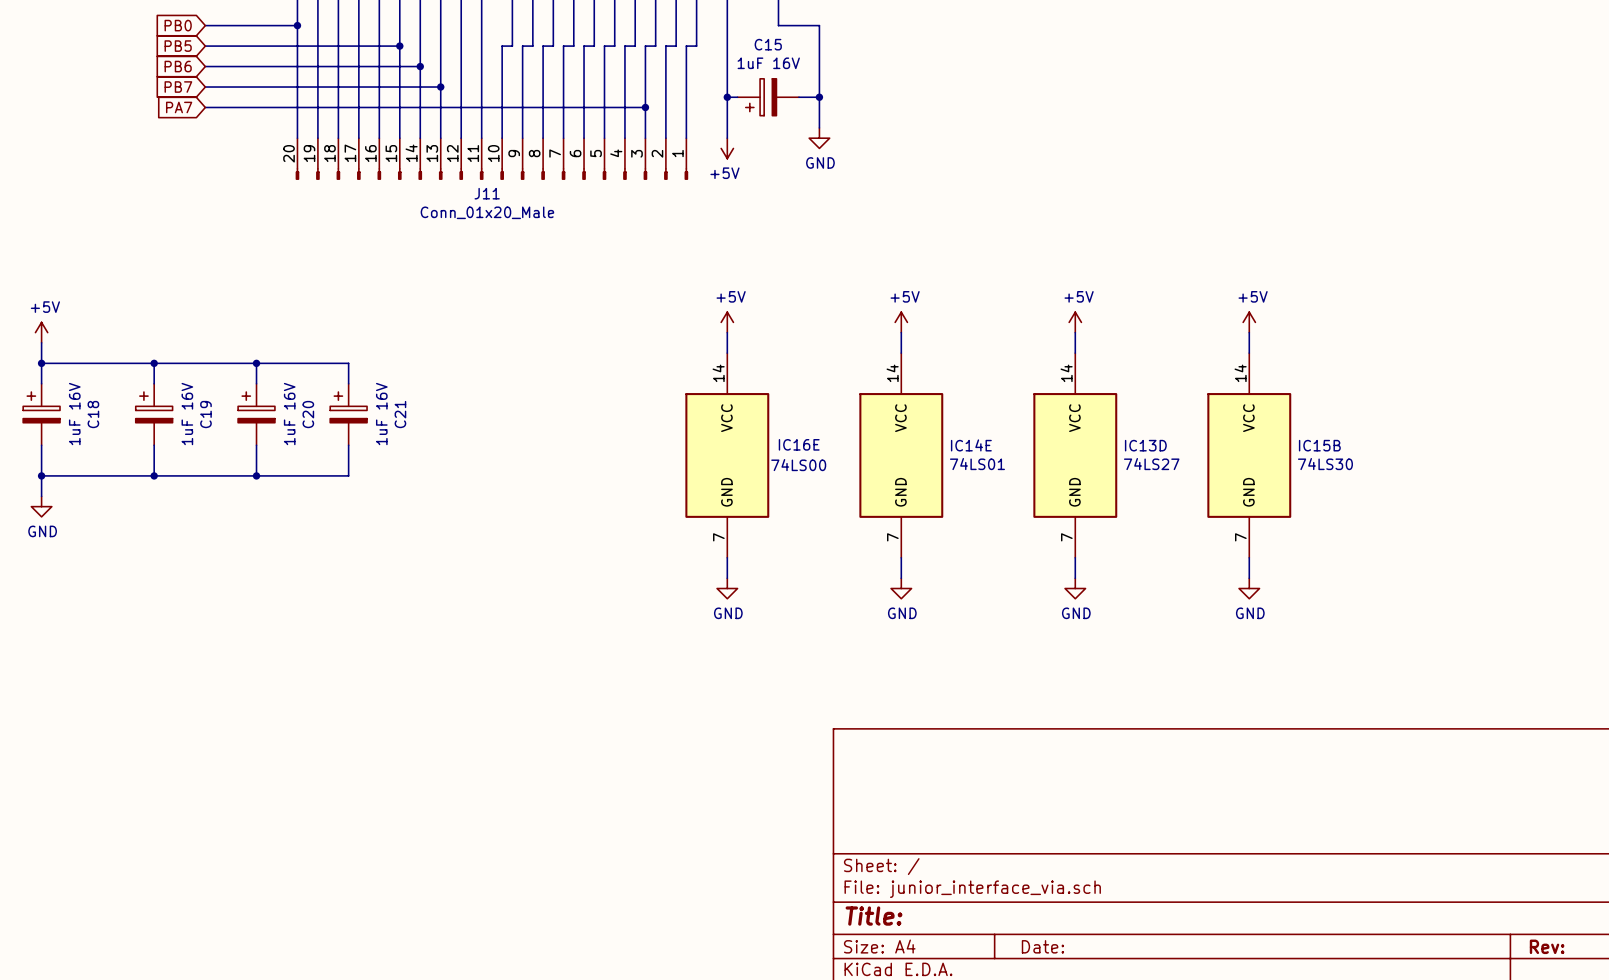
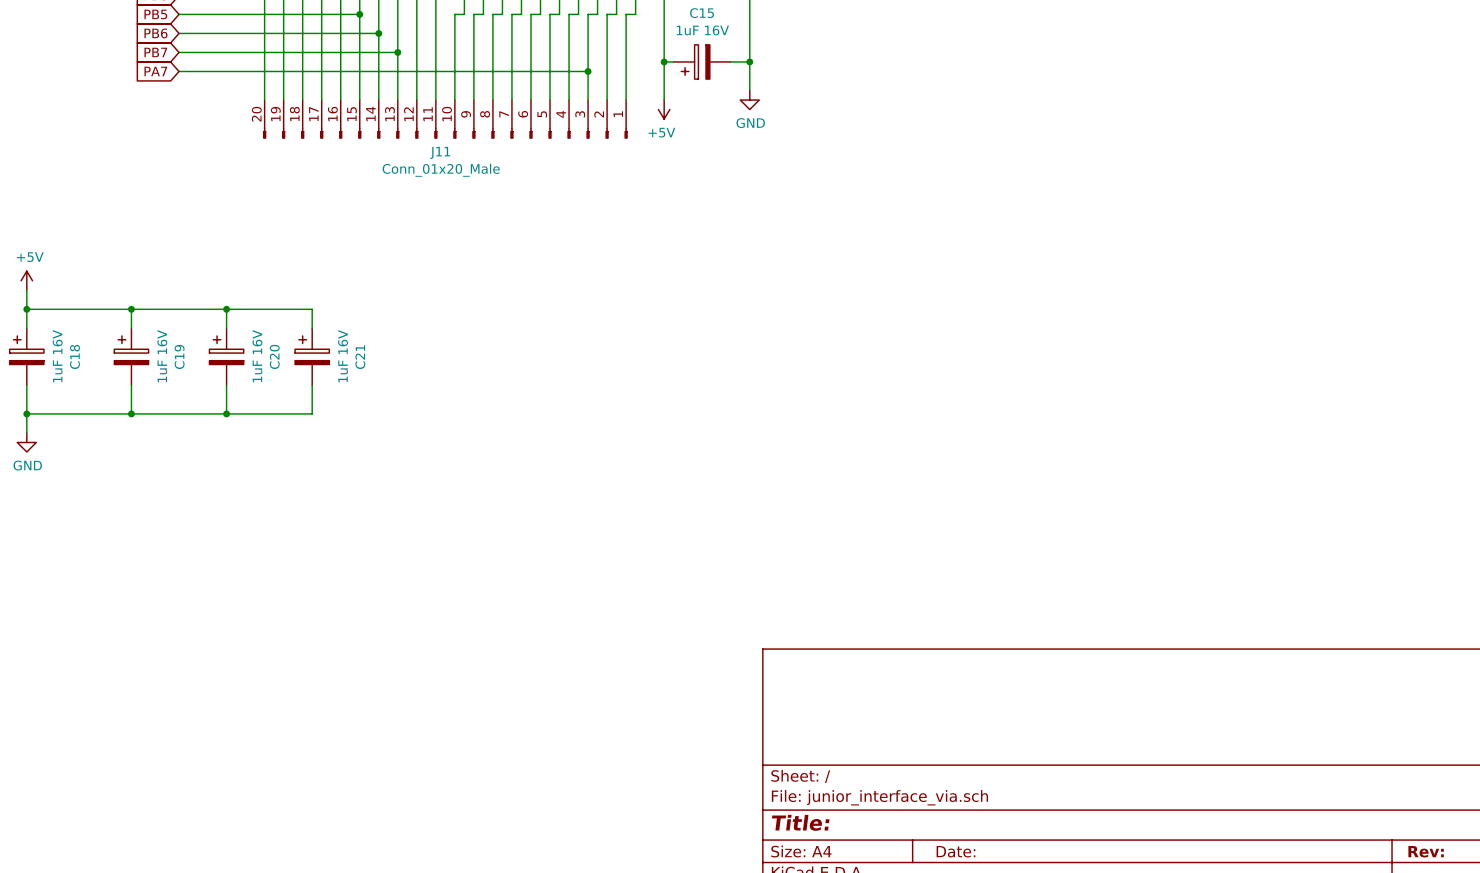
power symbol: +5V (727, 322) -> none
power symbol: +5V (901, 322) -> none
power symbol: +5V (1075, 322) -> none
power symbol: +5V (1249, 322) -> none
wire: (727, 332) (727, 353) -> none
wire: (901, 332) (901, 353) -> none
wire: (1075, 332) (1075, 353) -> none
wire: (1249, 332) (1249, 353) -> none
IC16E: 74LS00 (727, 455) -> none
IC14E: 74LS01 (901, 455) -> none
IC13D: 74LS27 (1075, 455) -> none
IC15B: 74LS30 (1249, 455) -> none
wire: (727, 557) (727, 578) -> none
wire: (901, 557) (901, 578) -> none
wire: (1075, 557) (1075, 578) -> none
wire: (1249, 557) (1249, 578) -> none
power symbol: GND (727, 588) -> none
power symbol: GND (901, 588) -> none
power symbol: GND (1075, 588) -> none
power symbol: GND (1249, 588) -> none

